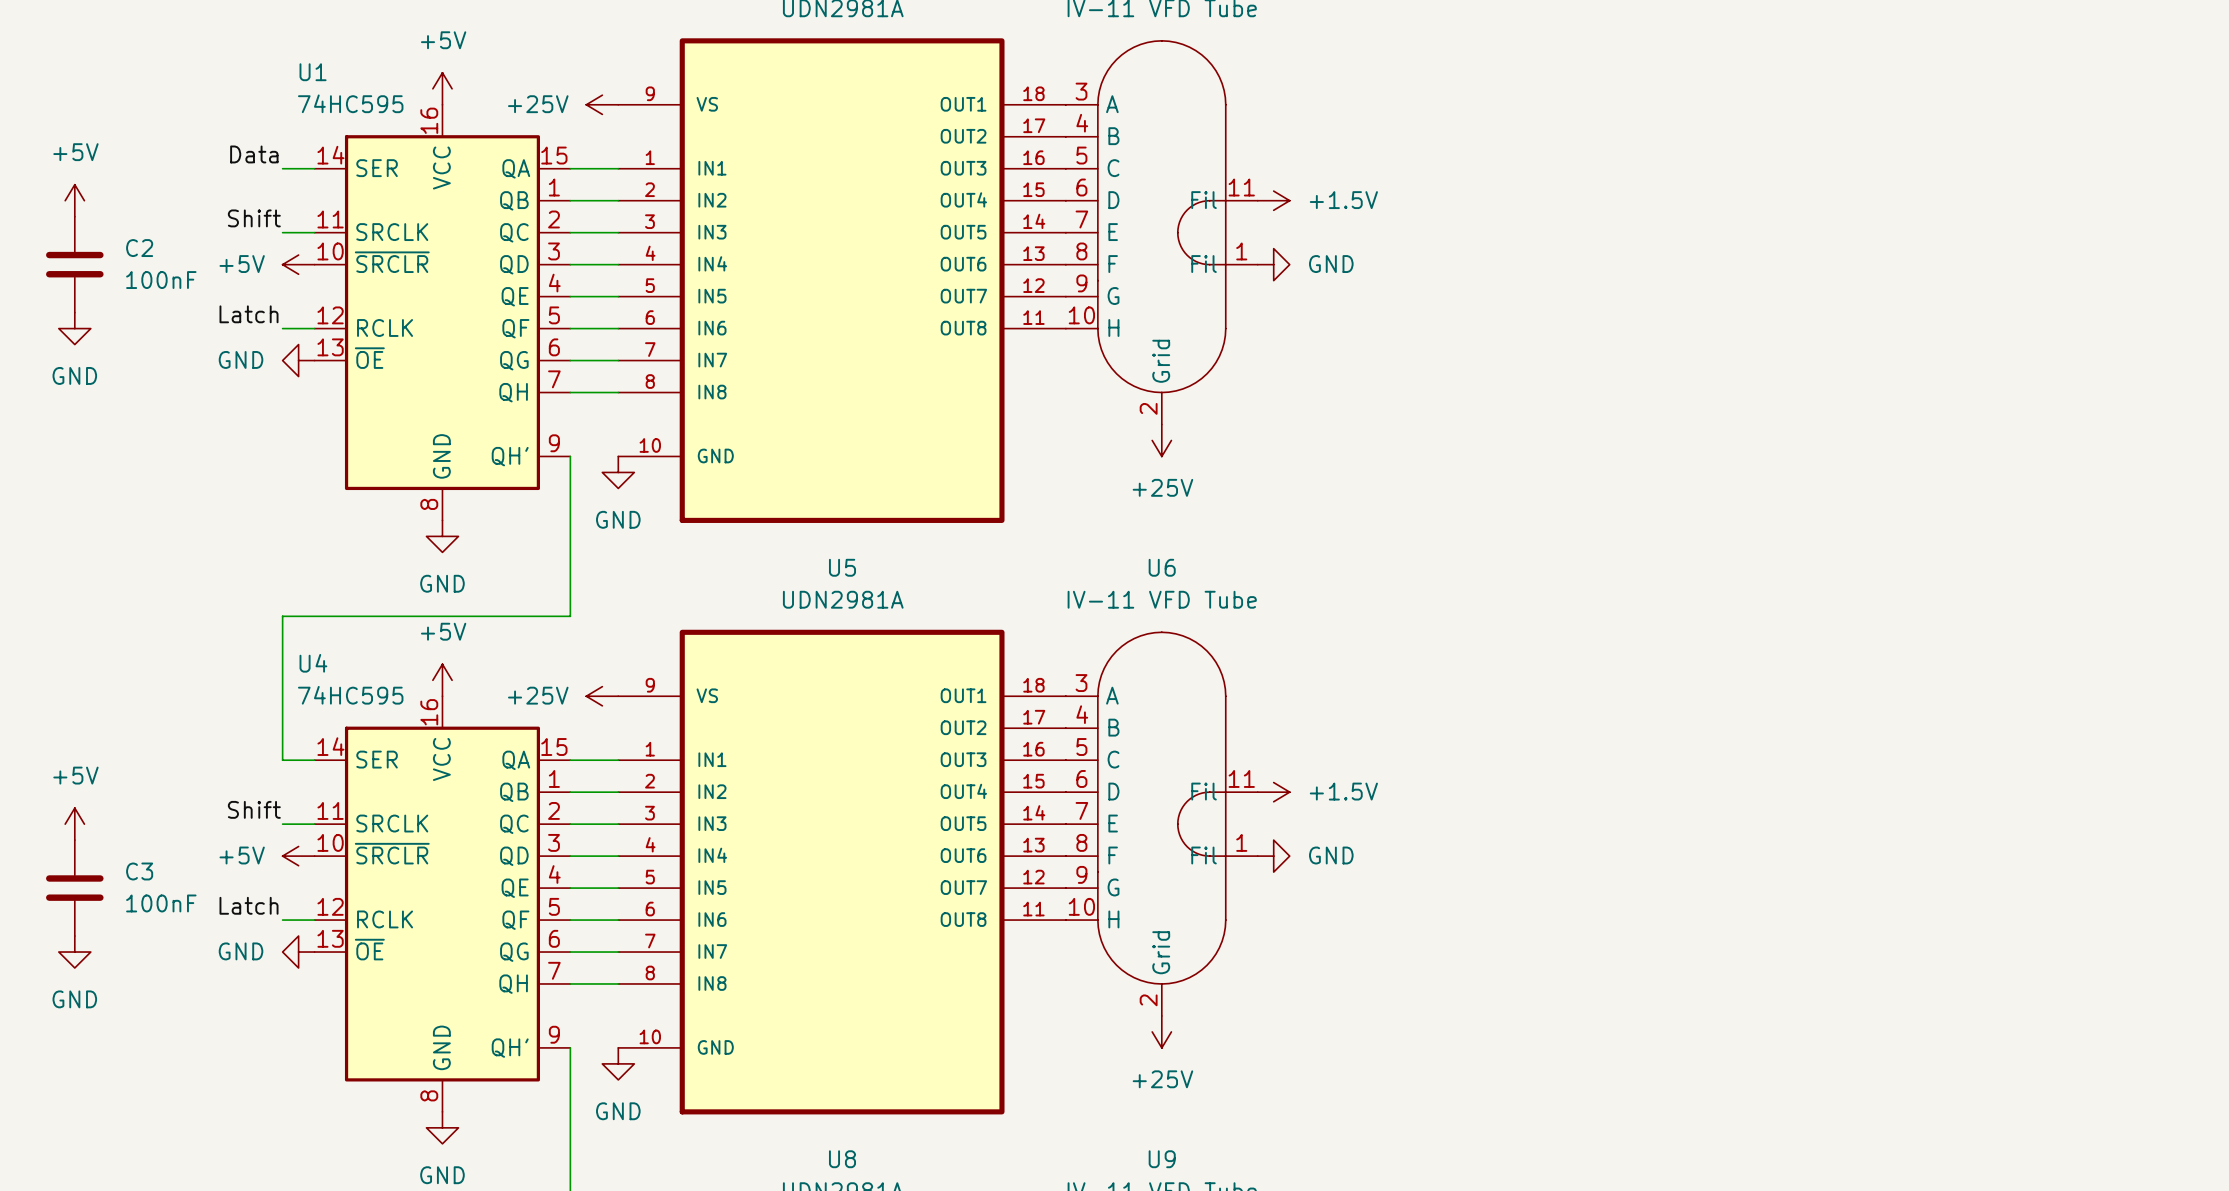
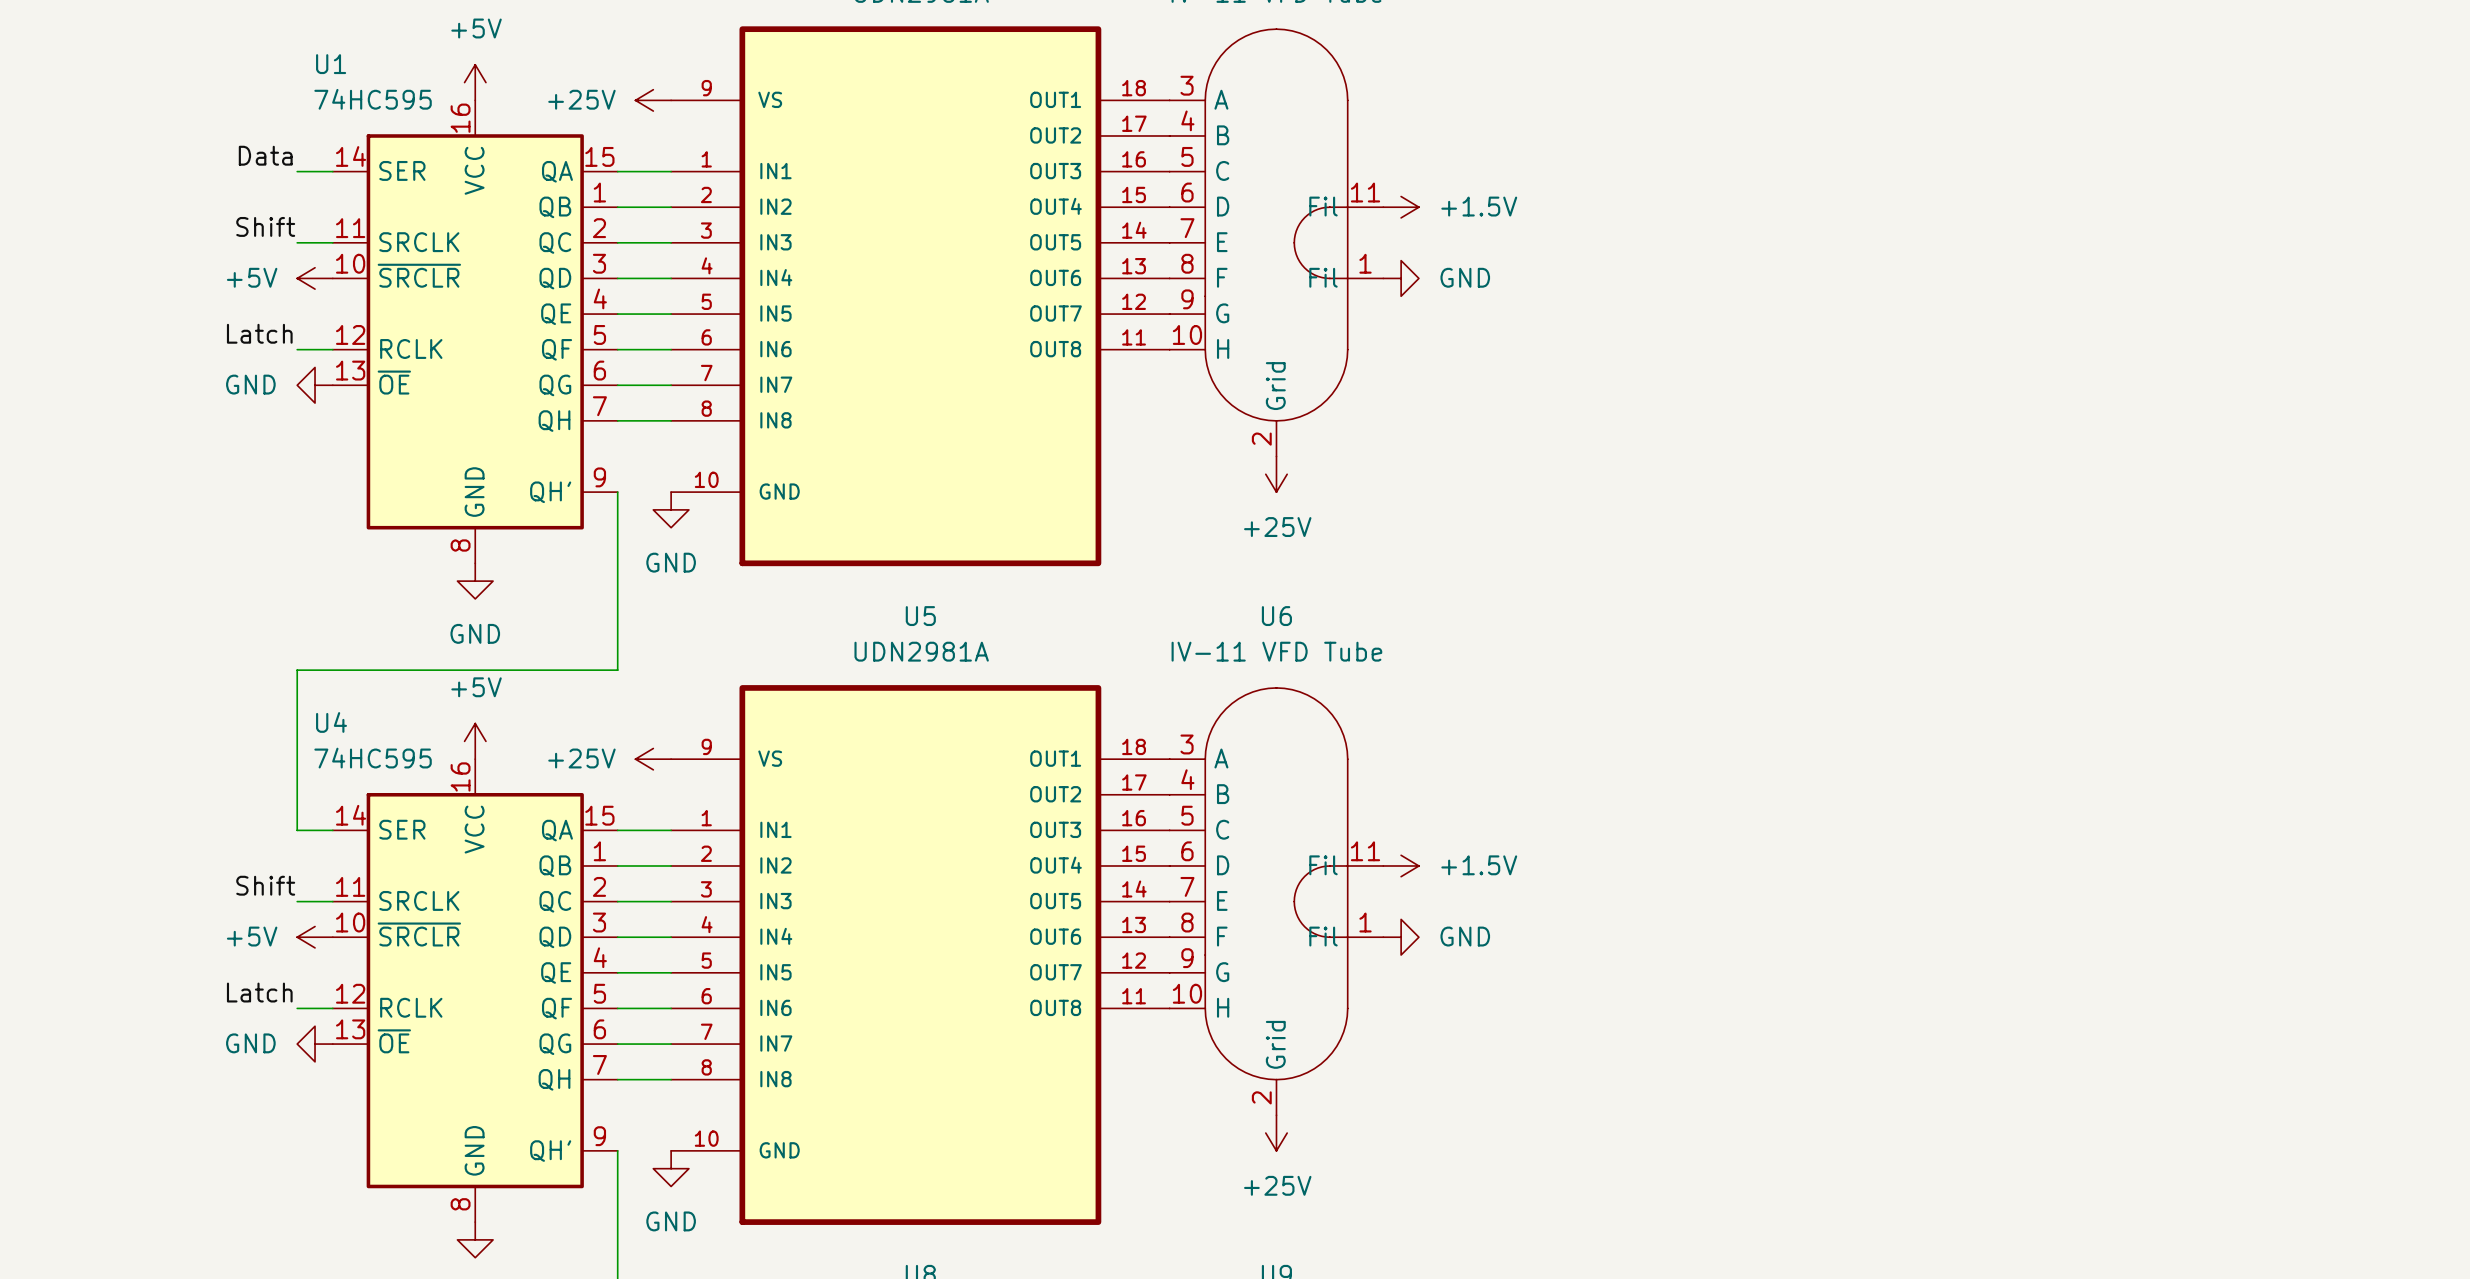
power symbol: +5V (74, 200) -> none
C2: 100nF (74, 264) -> none
power symbol: GND (74, 328) -> none
power symbol: +5V (74, 824) -> none
C3: 100nF (74, 888) -> none
power symbol: GND (74, 952) -> none

